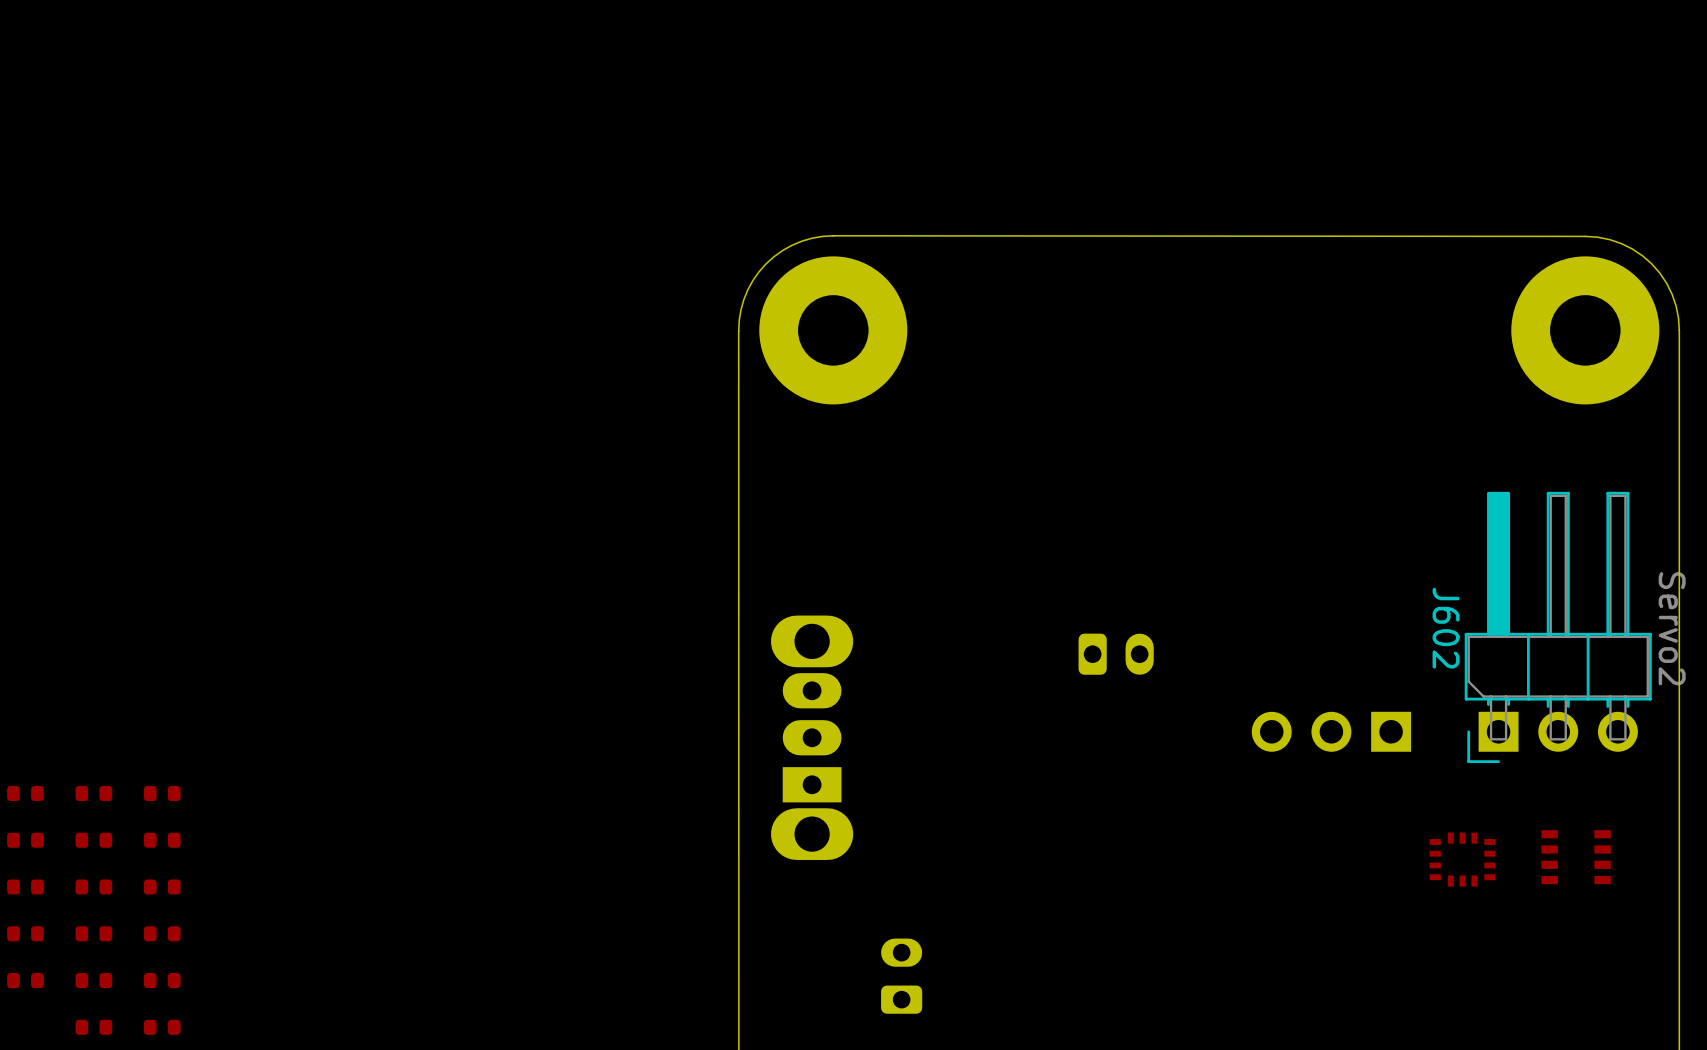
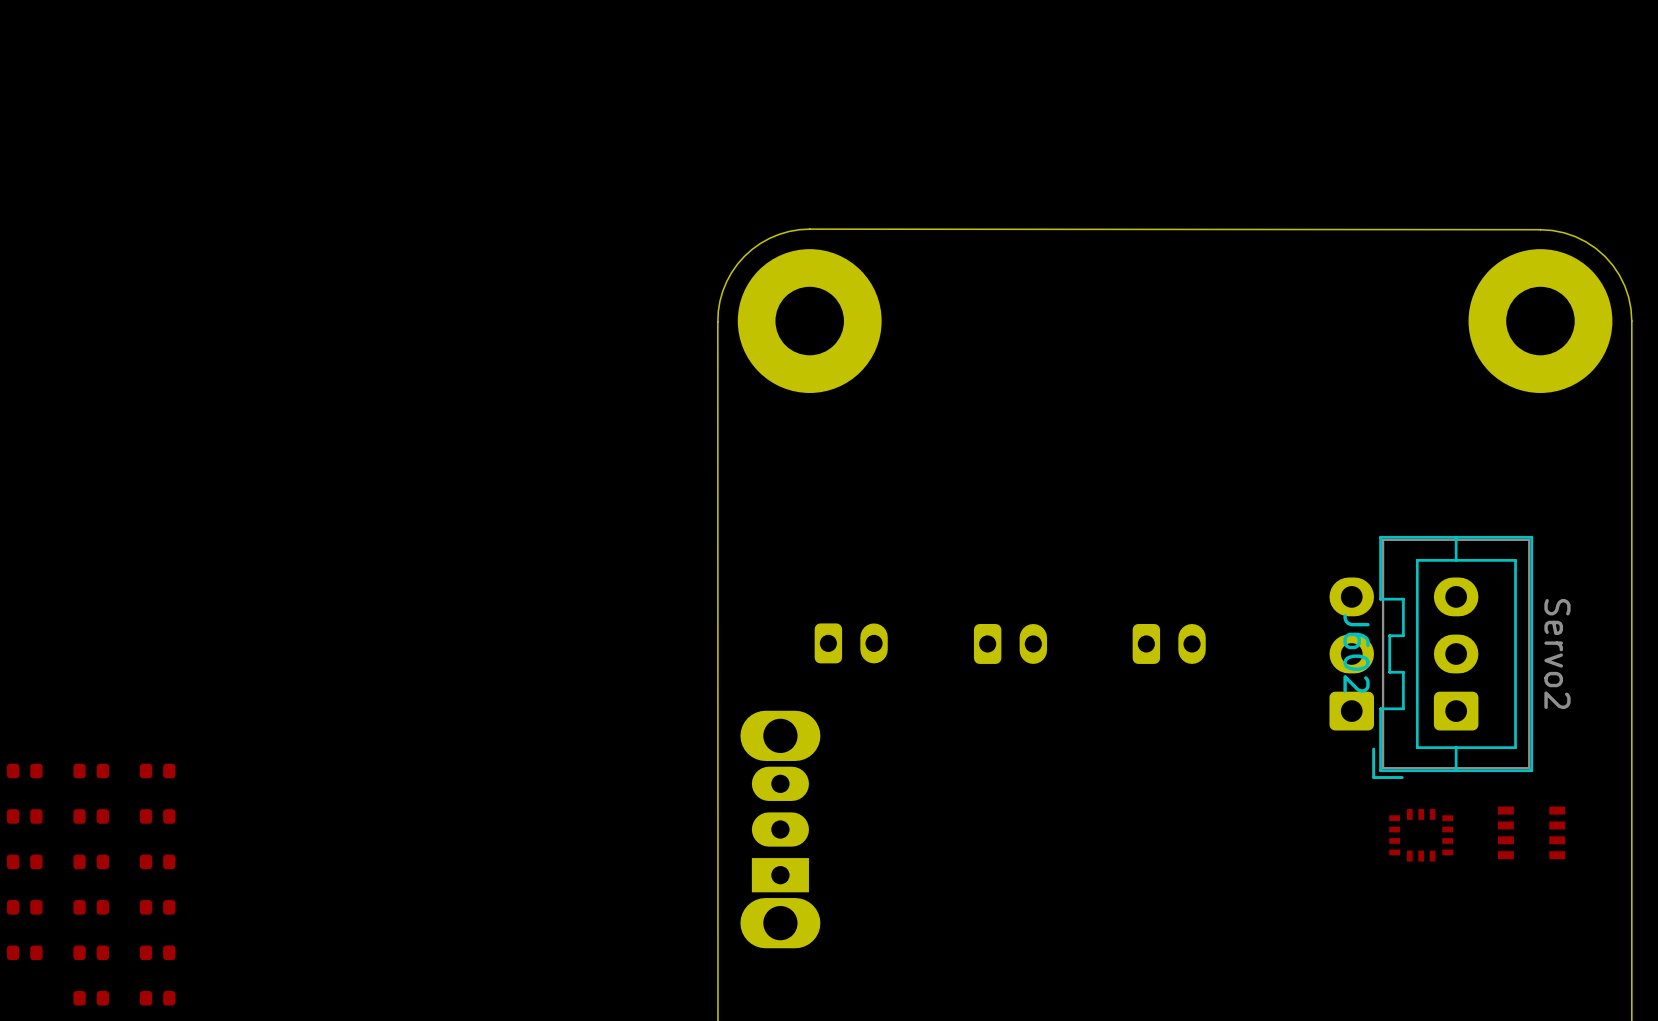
J602 footprint: [1464, 491, 1652, 764] -> [1372, 535, 1534, 779]
part: (1116, 654) -> none
part: none -> (851, 643)
part: none -> (1010, 643)
part: none -> (1169, 643)
part: none -> (1351, 653)
part: (1331, 731) -> none
part position: (812, 737) -> (780, 829)
part: (901, 976) -> none

